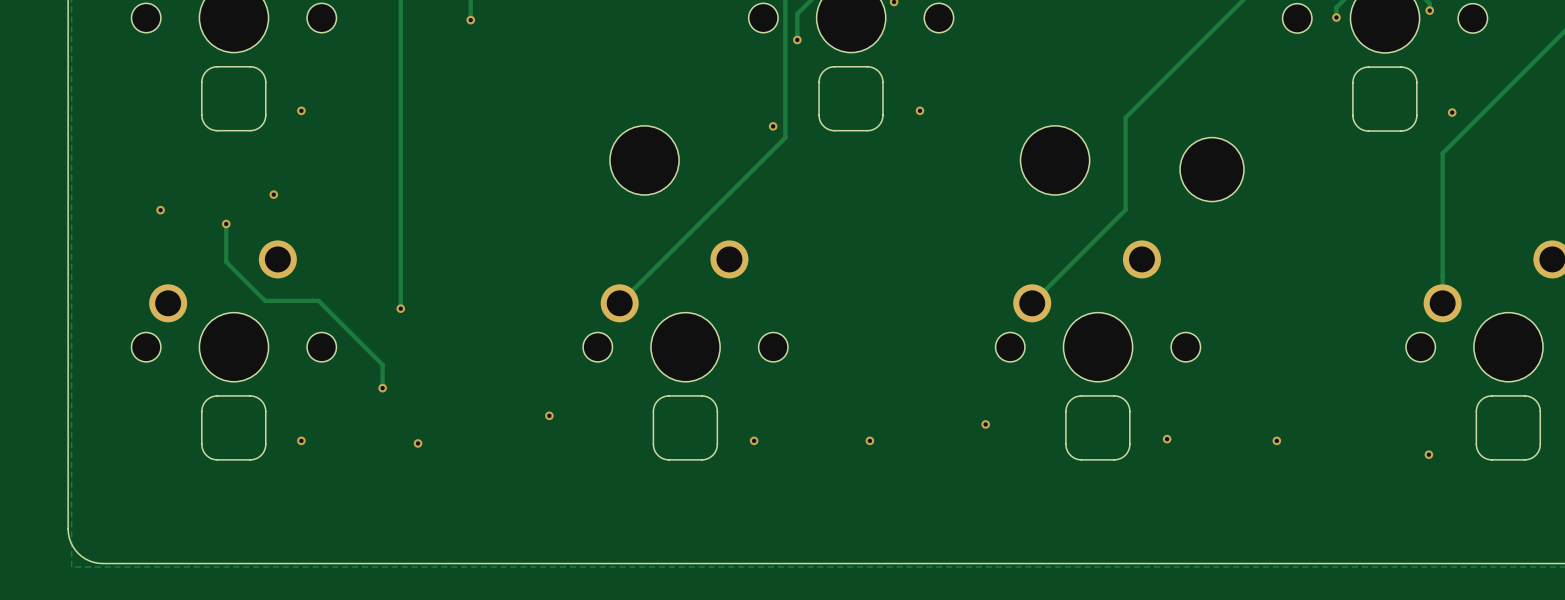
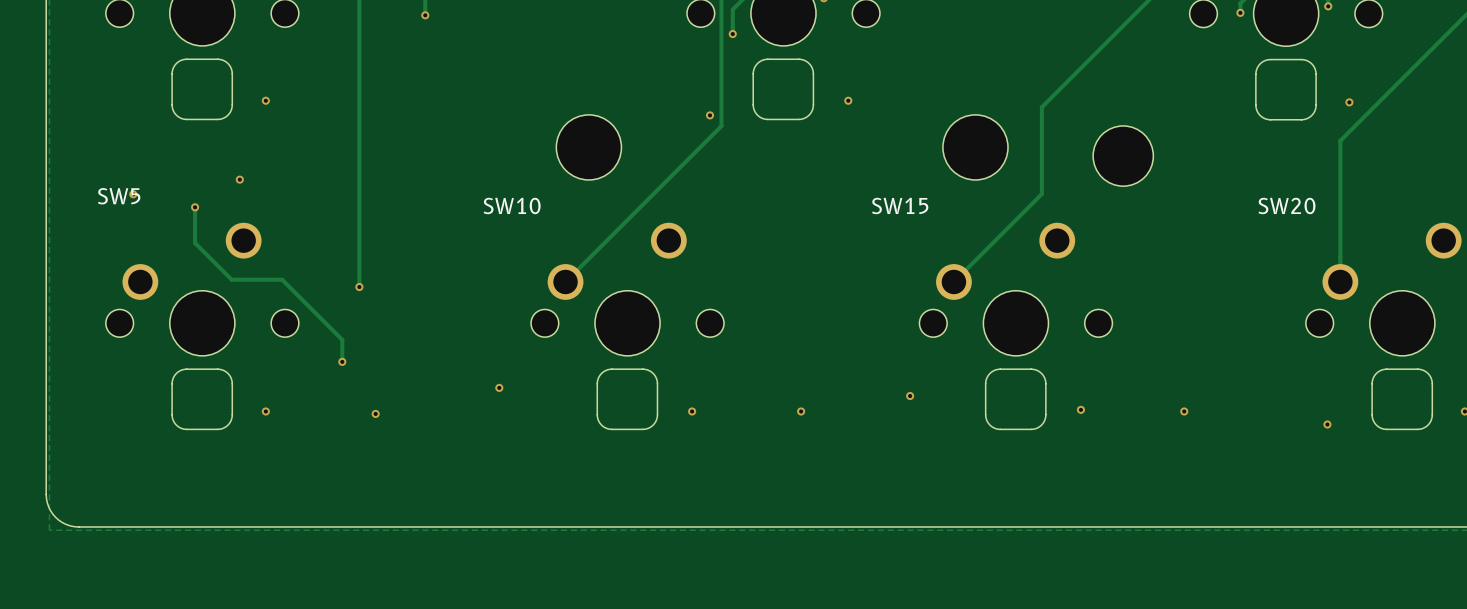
SW5 name: none -> SW5 (119, 196)
SW10 name: none -> SW10 (512, 205)
SW15 name: none -> SW15 (900, 205)
SW20 name: none -> SW20 (1286, 205)

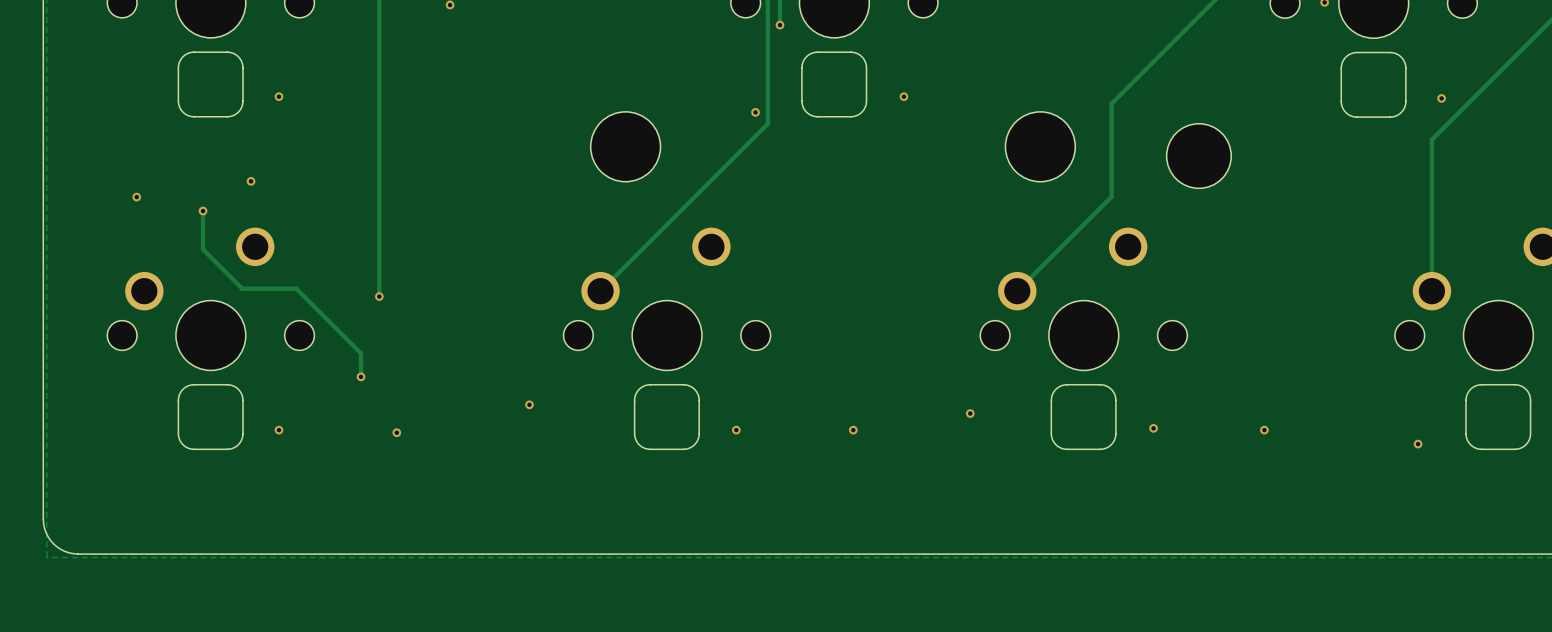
SW5 name: SW5 (119, 196) -> none
SW10 name: SW10 (512, 205) -> none
SW15 name: SW15 (900, 205) -> none
SW20 name: SW20 (1286, 205) -> none

